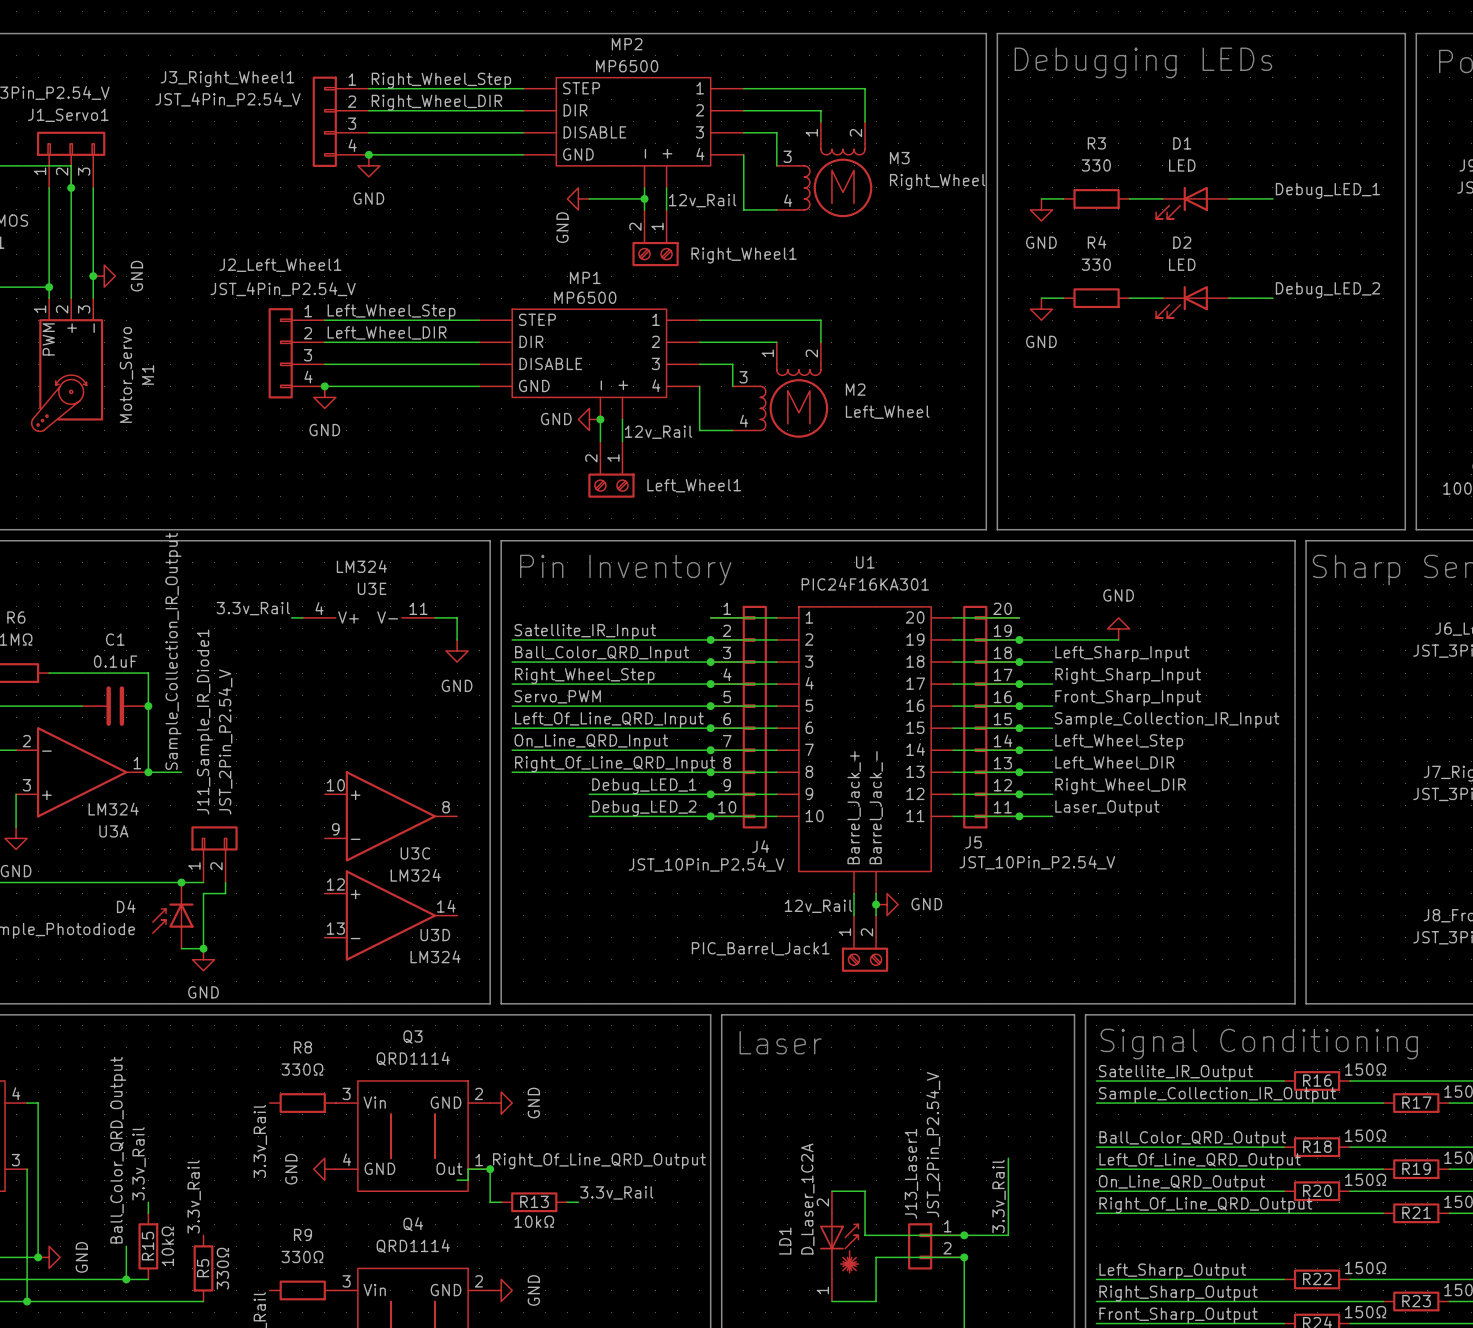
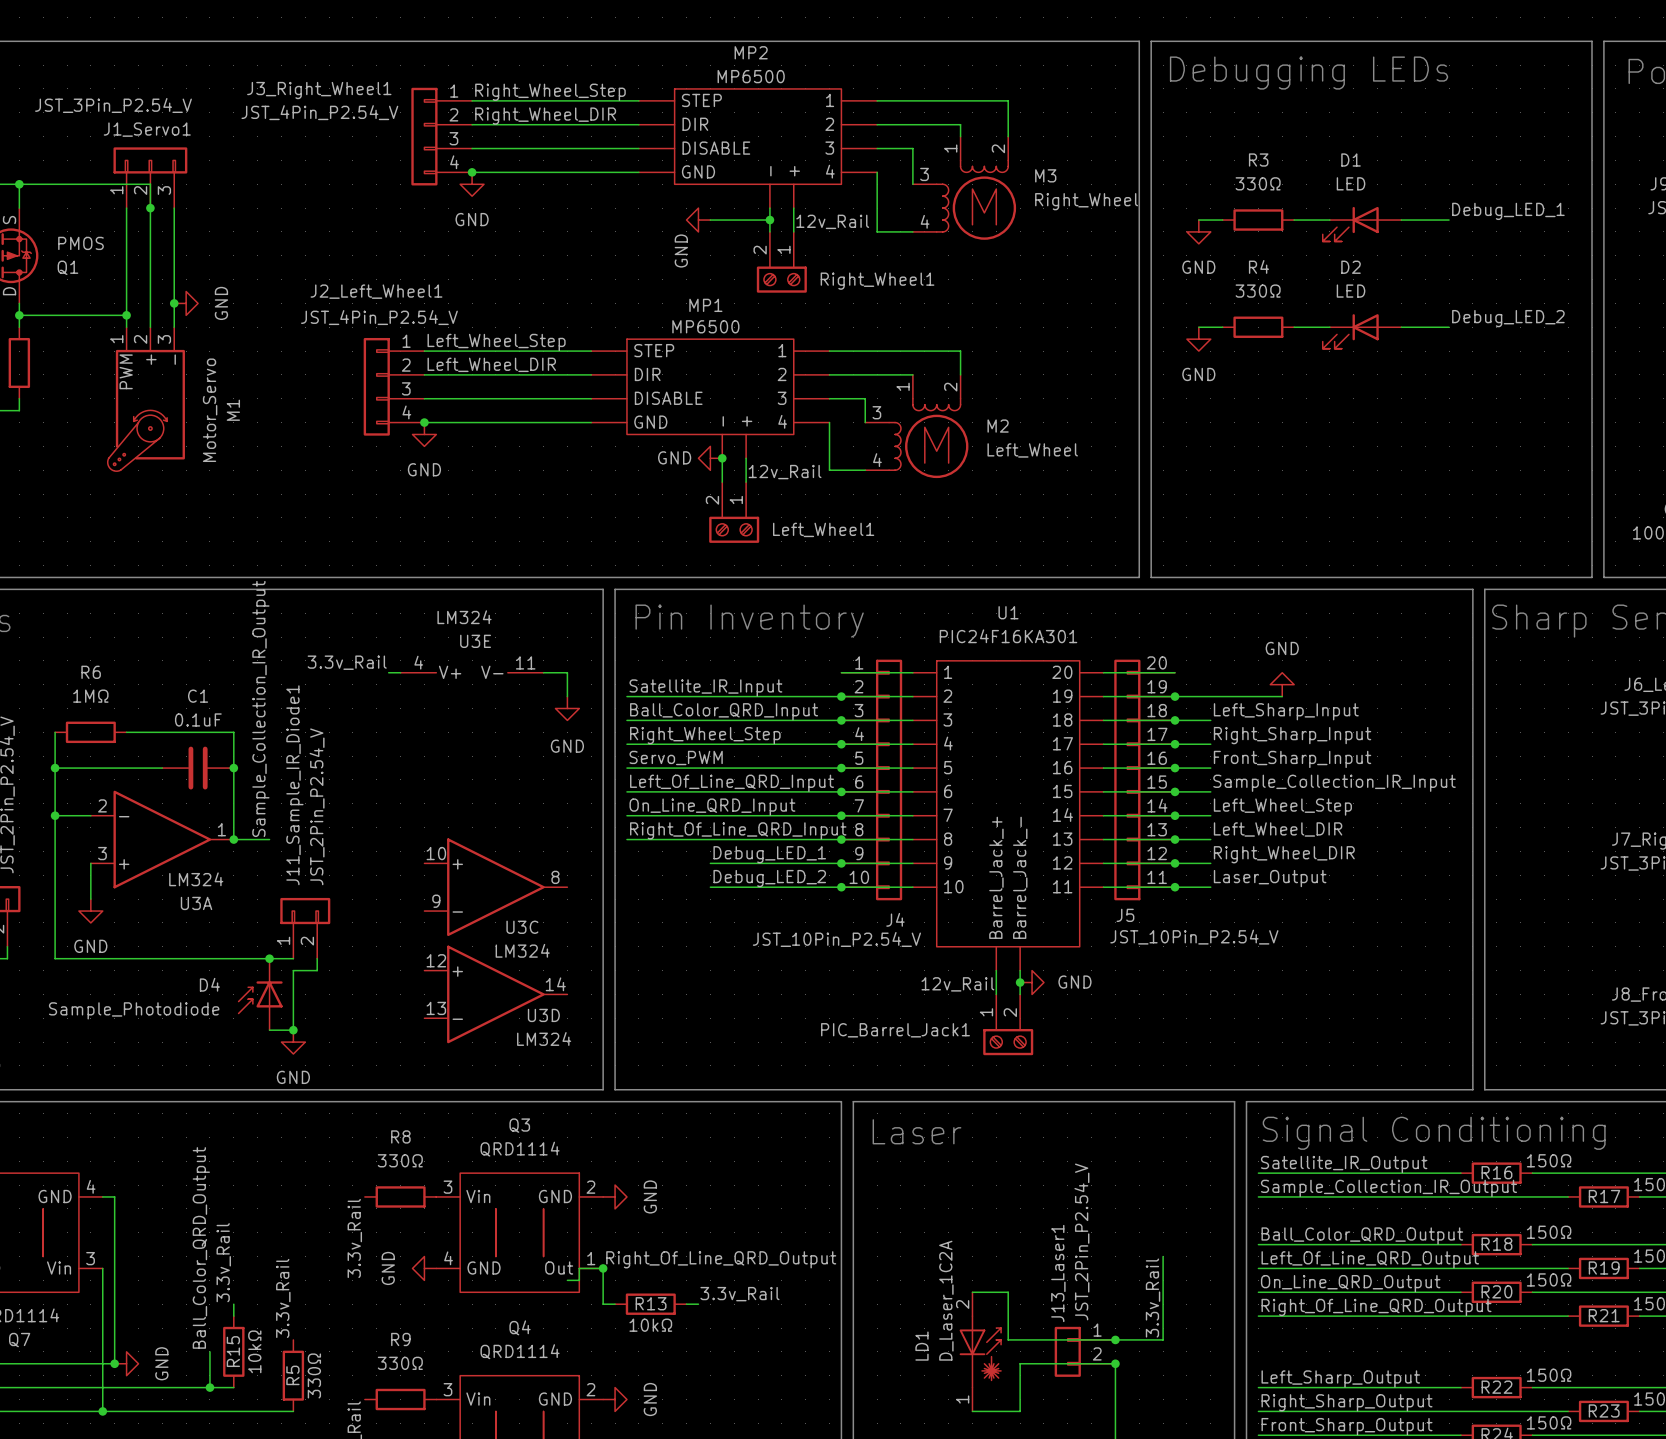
R3 value: 330 (1096, 165) -> 330Ω (1258, 183)
R4 value: 330 (1096, 264) -> 330Ω (1258, 291)

